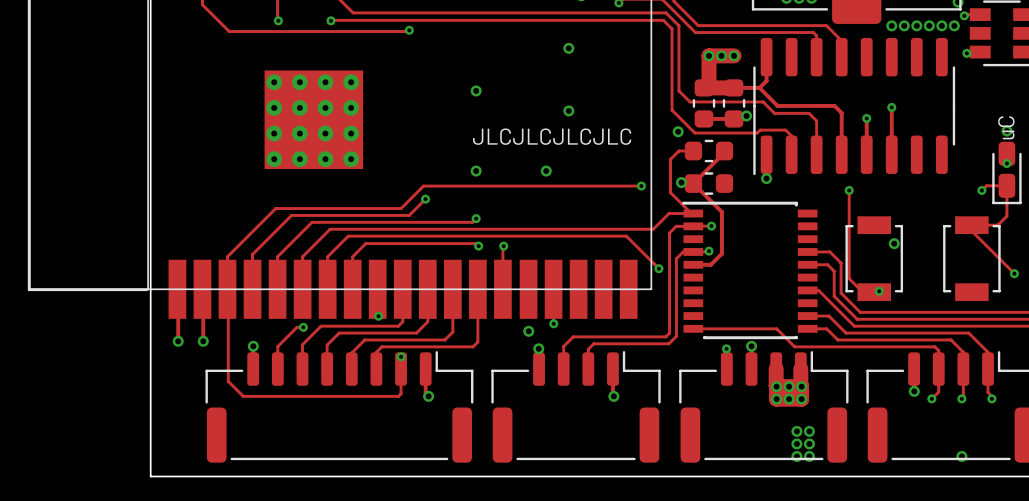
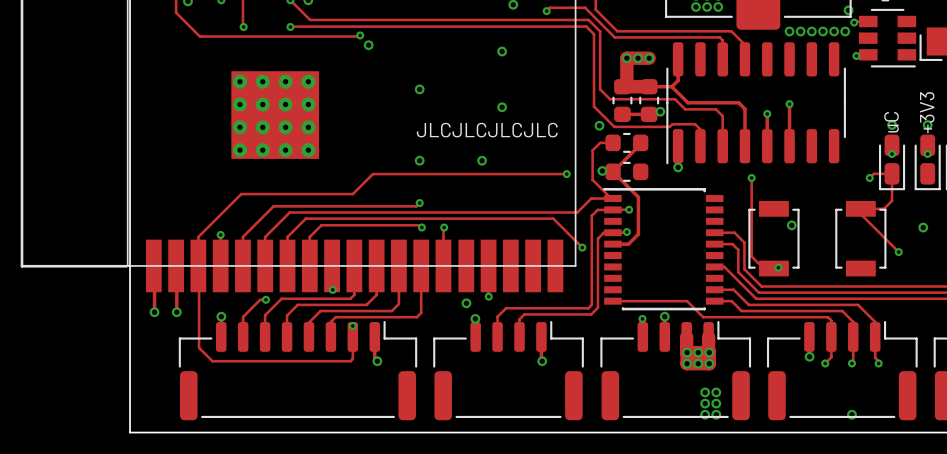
via: none -> (368, 45)
track: (425, 199) (409, 215) (291, 215) (252, 254) -> none
via: (425, 199) -> none
via: none -> (220, 234)

